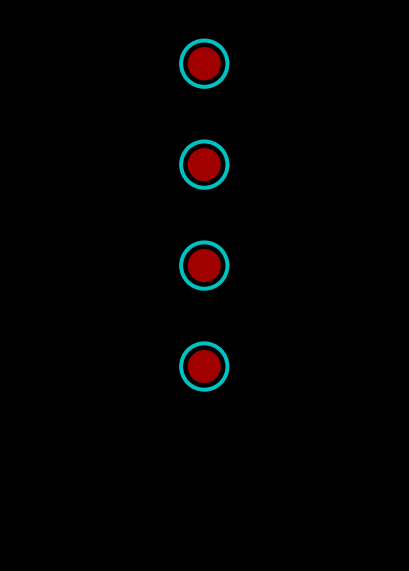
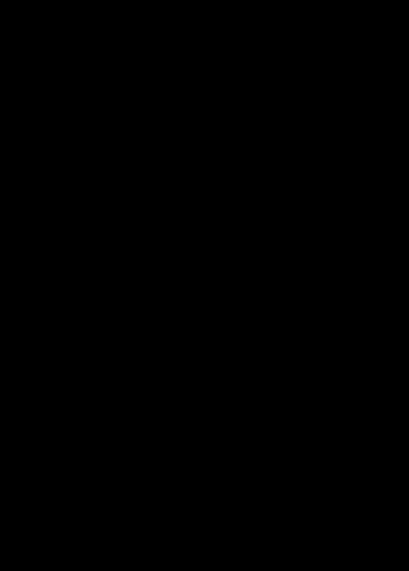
part: (204, 63) -> none
part: (204, 164) -> none
part: (204, 265) -> none
part: (204, 366) -> none

